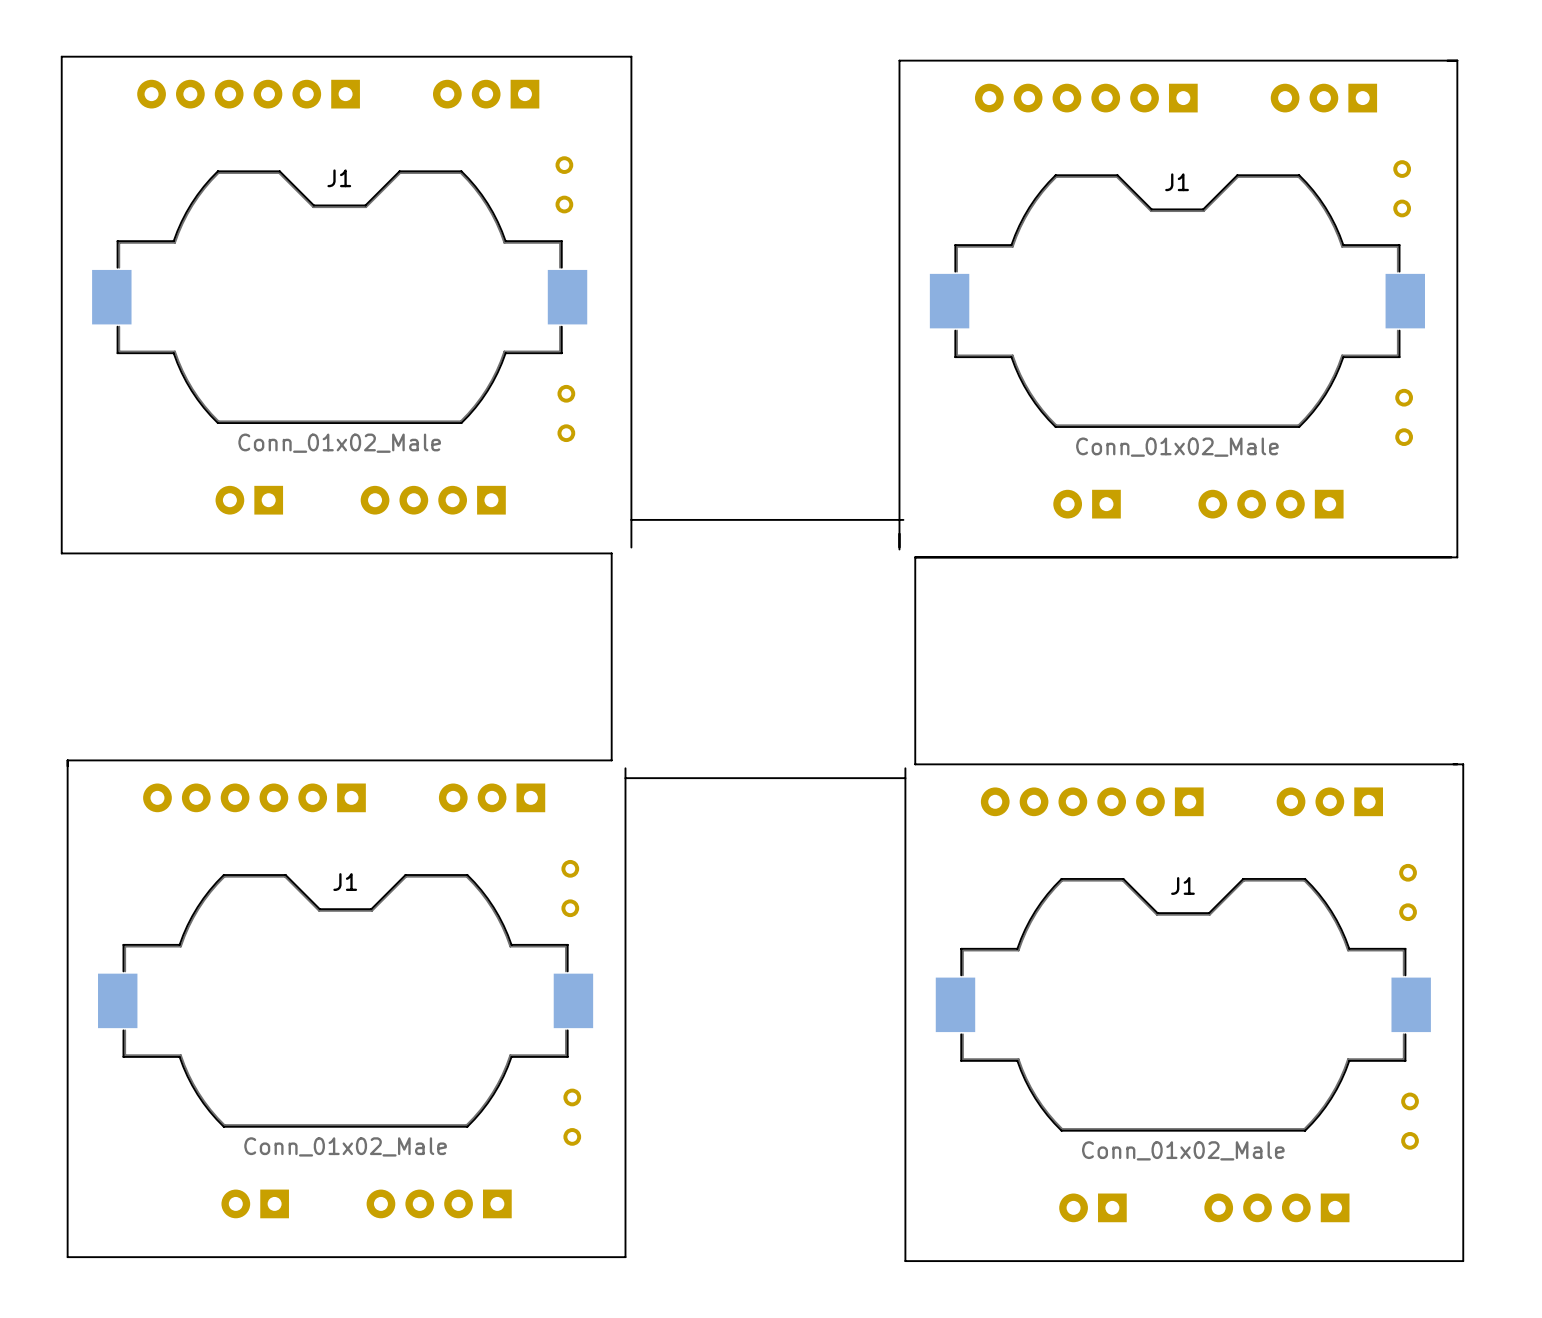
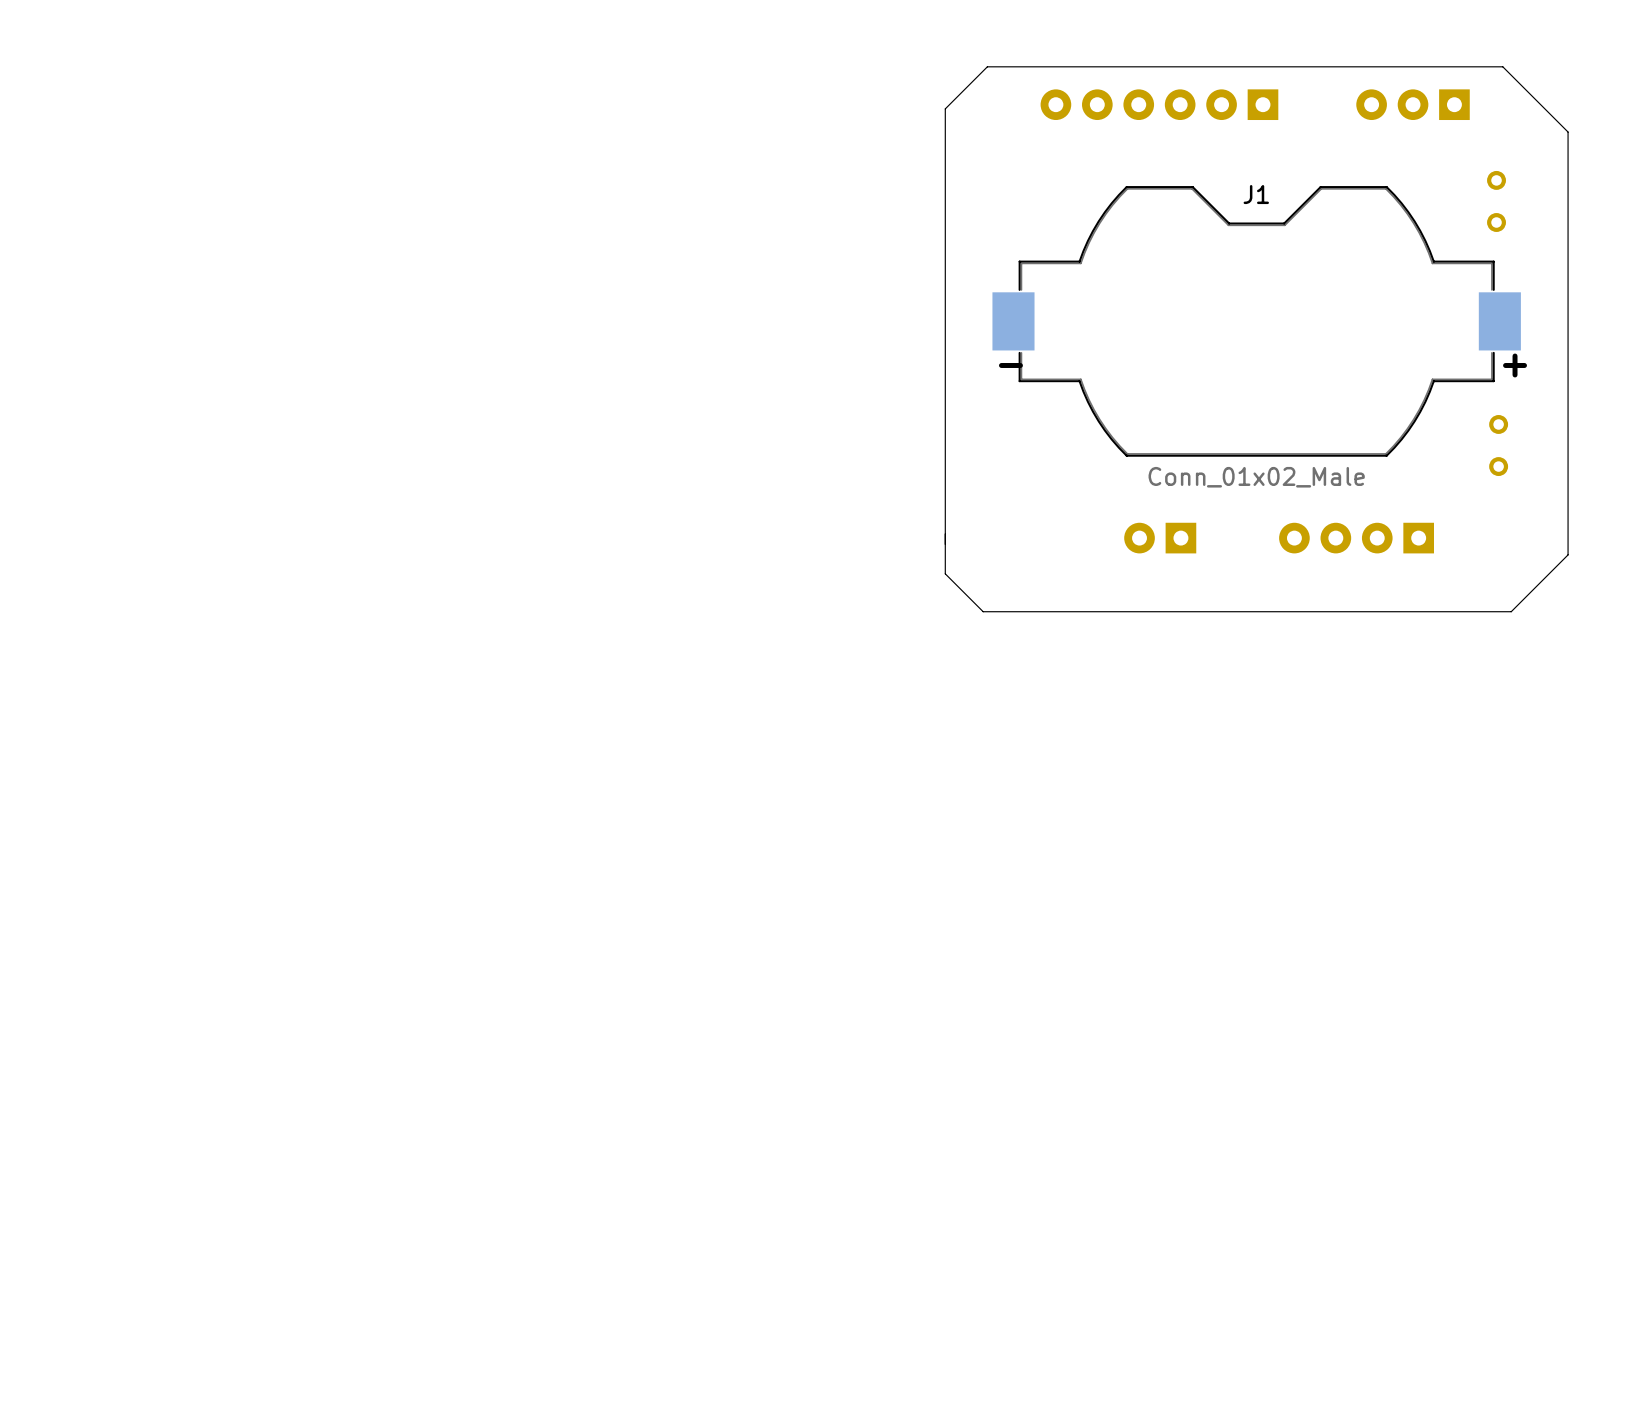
board edge: none -> (1502, 66) (987, 66) (945, 108) (945, 573) (983, 611) (1511, 611) (1568, 554) (1568, 132) (1502, 66)
part: (248, 94) -> none
part: (486, 94) -> none
part: (564, 165) -> none
part: (564, 204) -> none
J1: Conn_01x02_Male (339, 297) -> none
text: none -> - + (1262, 365)
part: (566, 393) -> none
part: (566, 433) -> none
part: (249, 500) -> none
part: (433, 500) -> none
board edge: (903, 519) (631, 519) -> none
board edge: (631, 547) (631, 56) (61, 56) (61, 553) (611, 553) (611, 760) (67, 760) (67, 1257) (625, 1257) (625, 768) -> none
board edge: (899, 549) (899, 60) (1457, 60) (1457, 557) (915, 557) (915, 764) (1463, 764) (1463, 1261) (905, 1261) (905, 768) -> none
board edge: (905, 778) (625, 778) -> none
part: (254, 797) -> none
part: (492, 797) -> none
part: (1092, 801) -> none
part: (1329, 801) -> none
part: (570, 868) -> none
part: (1408, 872) -> none
part: (570, 908) -> none
part: (1408, 912) -> none
J1: Conn_01x02_Male (345, 1000) -> none
J1: Conn_01x02_Male (1183, 1004) -> none
part: (572, 1097) -> none
part: (1410, 1101) -> none
part: (572, 1136) -> none
part: (1410, 1140) -> none
part: (255, 1203) -> none
part: (439, 1203) -> none
part: (1092, 1207) -> none
part: (1276, 1207) -> none

